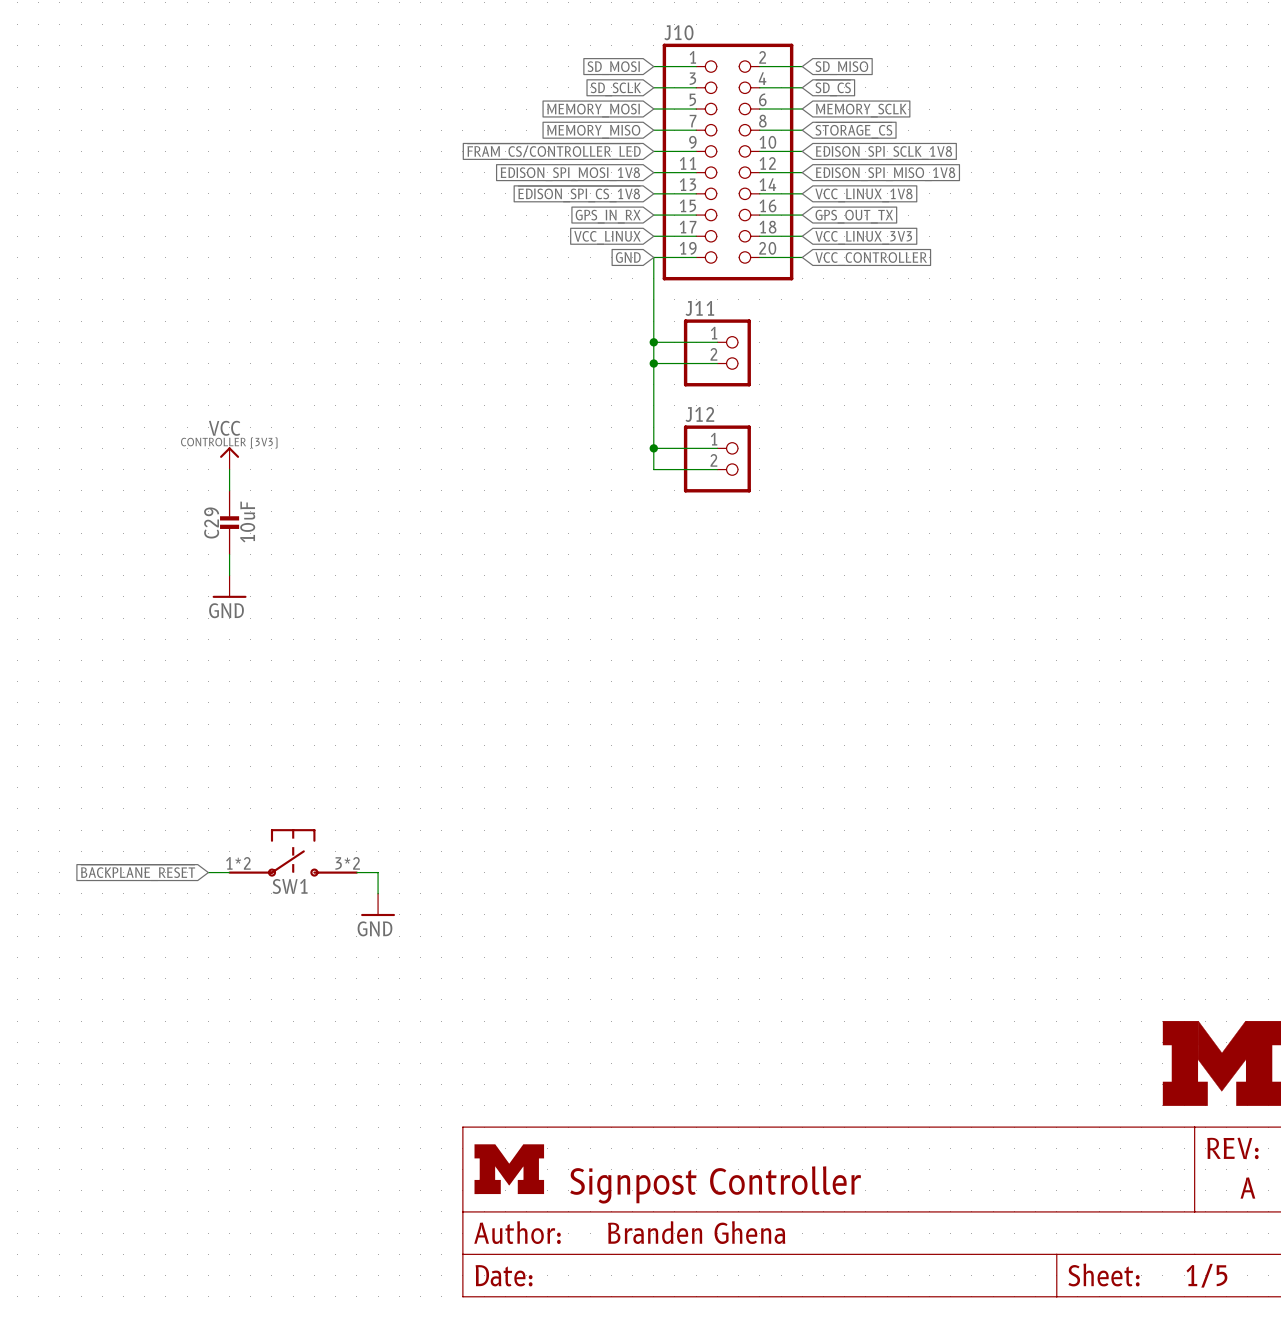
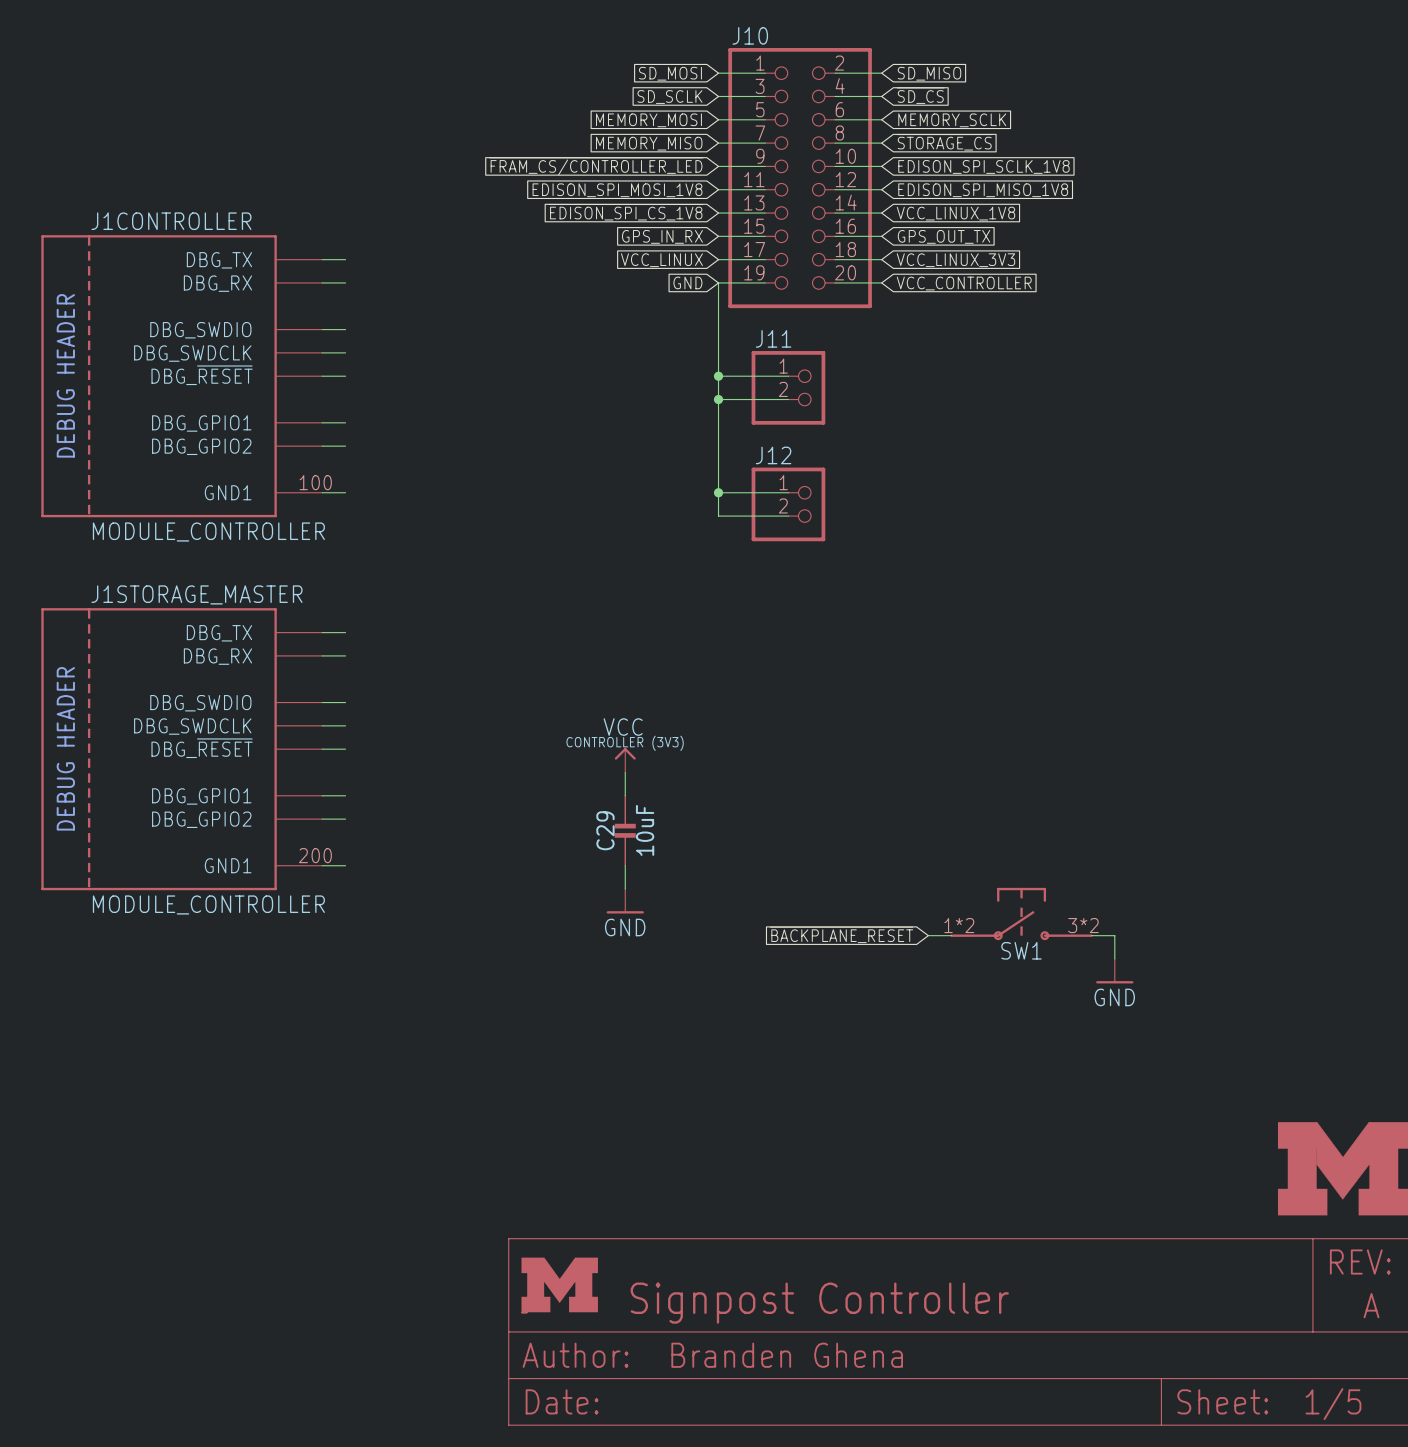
wire: none -> (322, 259) (345, 259)
wire: none -> (322, 282) (345, 282)
wire: none -> (322, 329) (345, 329)
wire: none -> (322, 352) (345, 352)
J1CONTROLLER: none -> MODULE_CONTROLLER (181, 376)
wire: none -> (322, 376) (345, 376)
wire: none -> (322, 422) (345, 422)
wire: none -> (322, 446) (345, 446)
wire: none -> (322, 492) (345, 492)
power symbol: (229, 458) -> none
wire: (229, 469) (229, 490) -> none
C29 position: (229, 522) -> (625, 830)
wire: (229, 554) (229, 575) -> none
wire: none -> (322, 632) (345, 632)
power symbol: GND (229, 586) -> none
wire: none -> (322, 655) (345, 655)
wire: none -> (322, 702) (345, 702)
wire: none -> (322, 725) (345, 725)
J1STORAGE_MASTER: none -> MODULE_CONTROLLER (181, 749)
wire: none -> (322, 749) (345, 749)
power symbol: none -> (625, 760)
wire: none -> (625, 772) (625, 795)
wire: none -> (322, 795) (345, 795)
wire: none -> (322, 819) (345, 819)
wire: none -> (625, 865) (625, 889)
power symbol: none -> GND (625, 901)
global label: none -> ~{BACKPLANE_RESET} (841, 934)
wire: none -> (928, 935) (951, 935)
wire: none -> (1091, 935) (1114, 935) (1114, 958)
SW1 position: (293, 852) -> (1021, 914)
global label: ~{BACKPLANE_RESET} (138, 872) -> none
wire: (208, 872) (229, 872) -> (322, 865) (345, 865)
wire: (356, 872) (378, 872) (378, 893) -> none
power symbol: none -> GND (1114, 971)
power symbol: GND (378, 904) -> none

